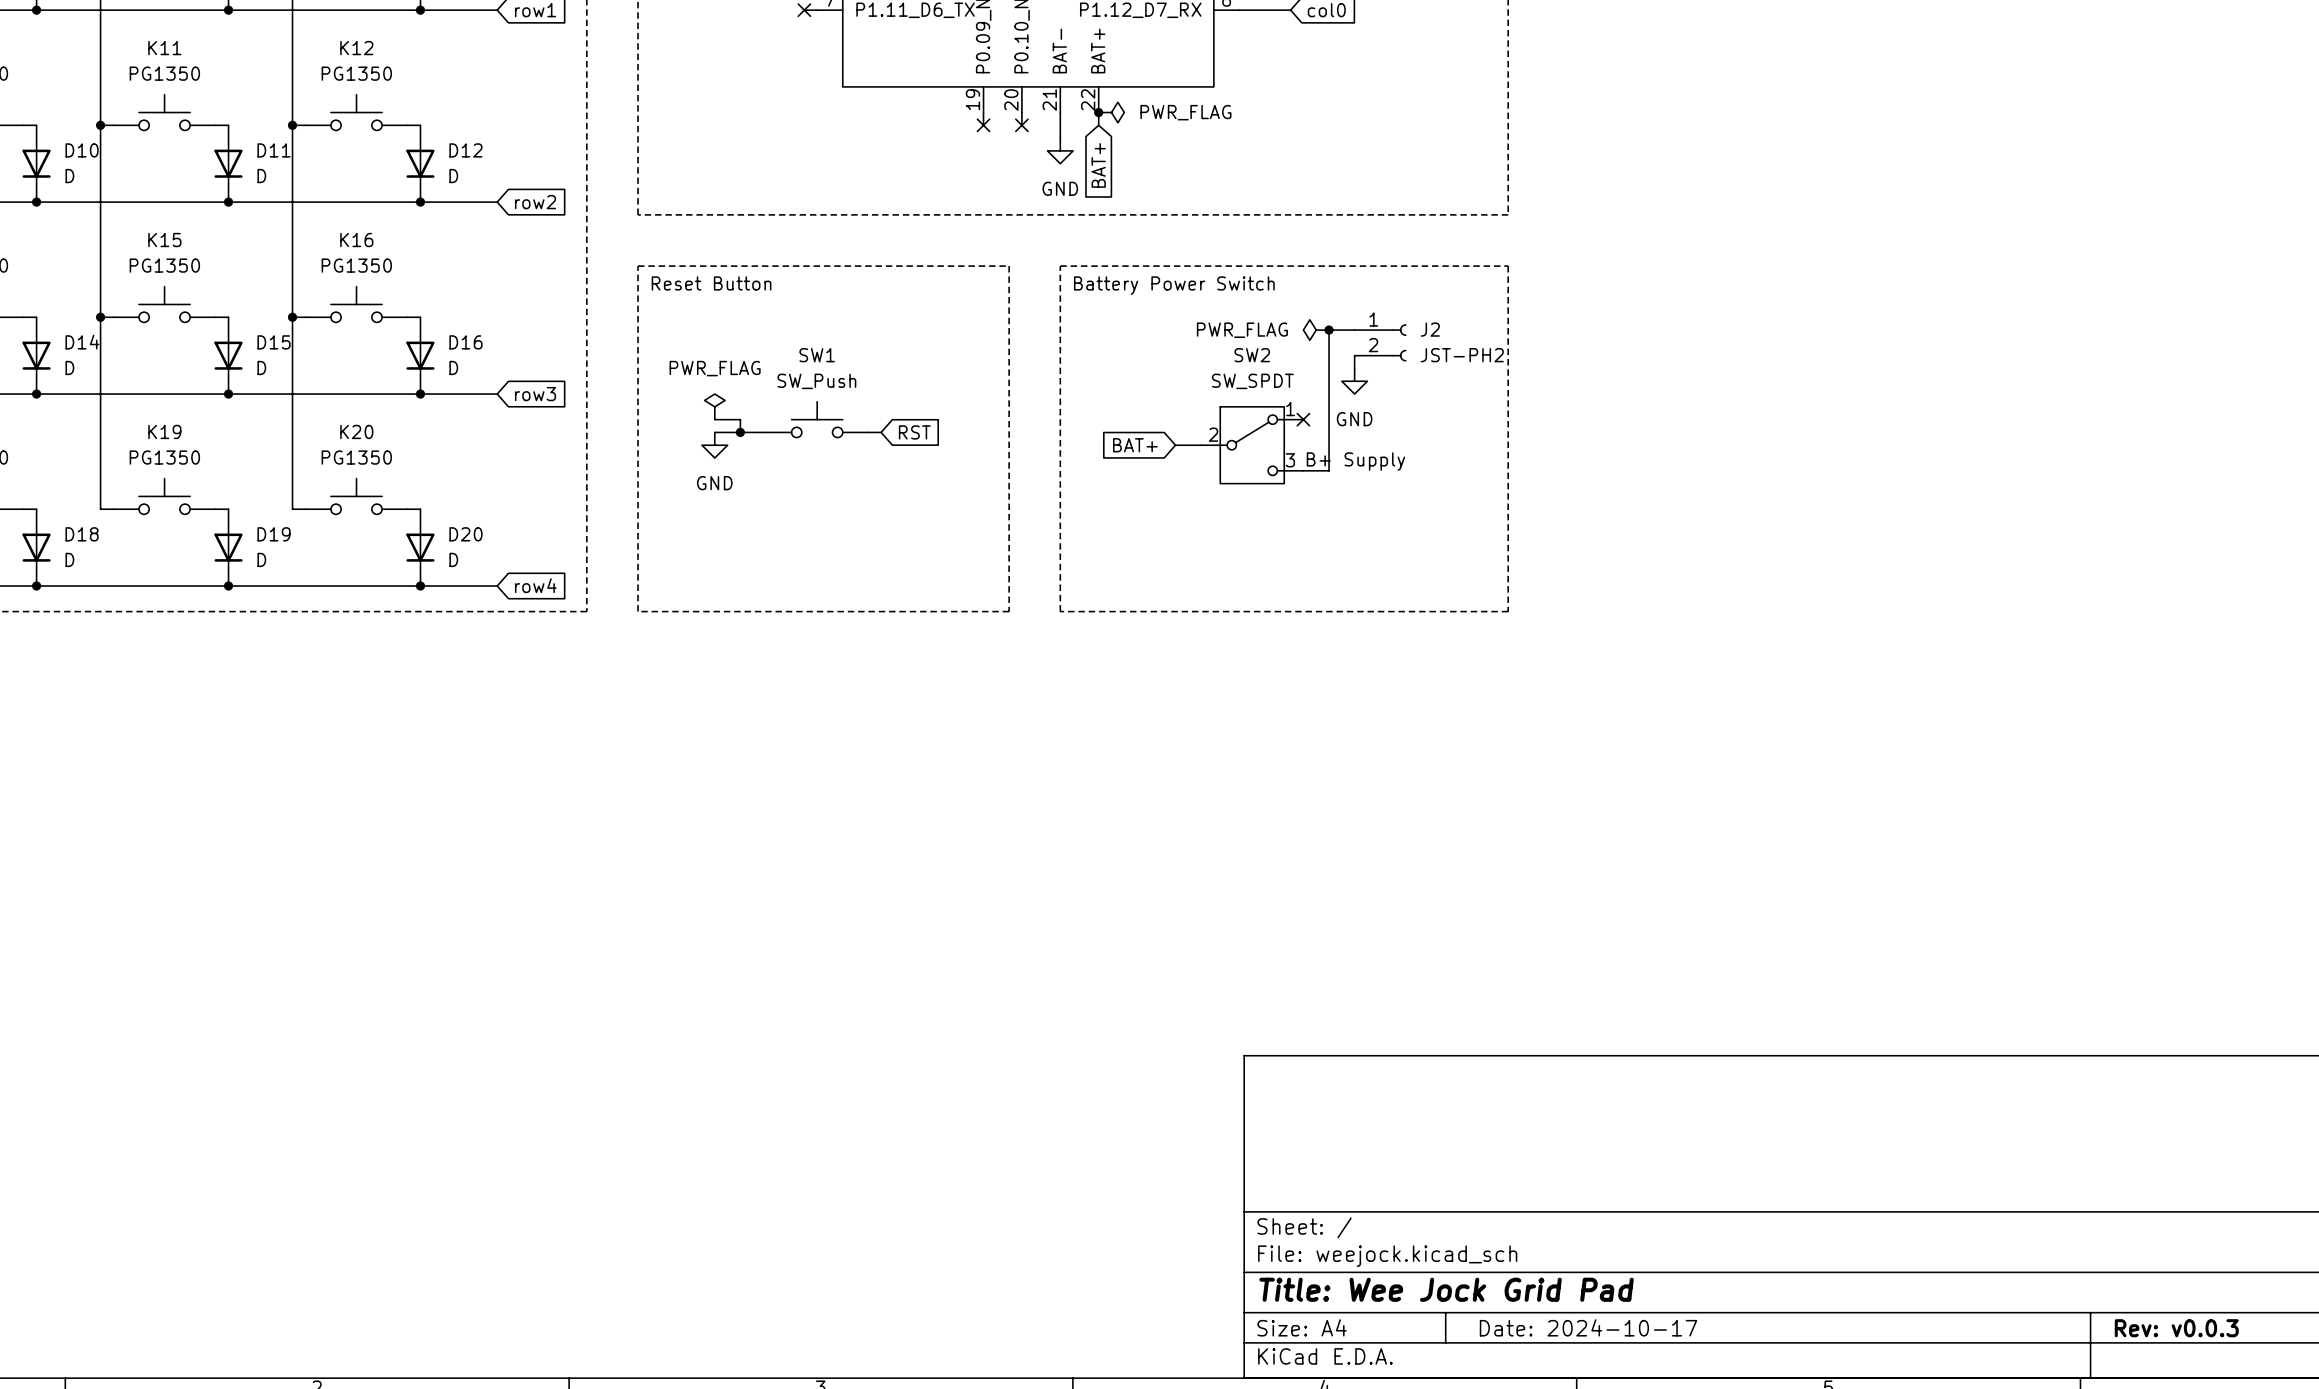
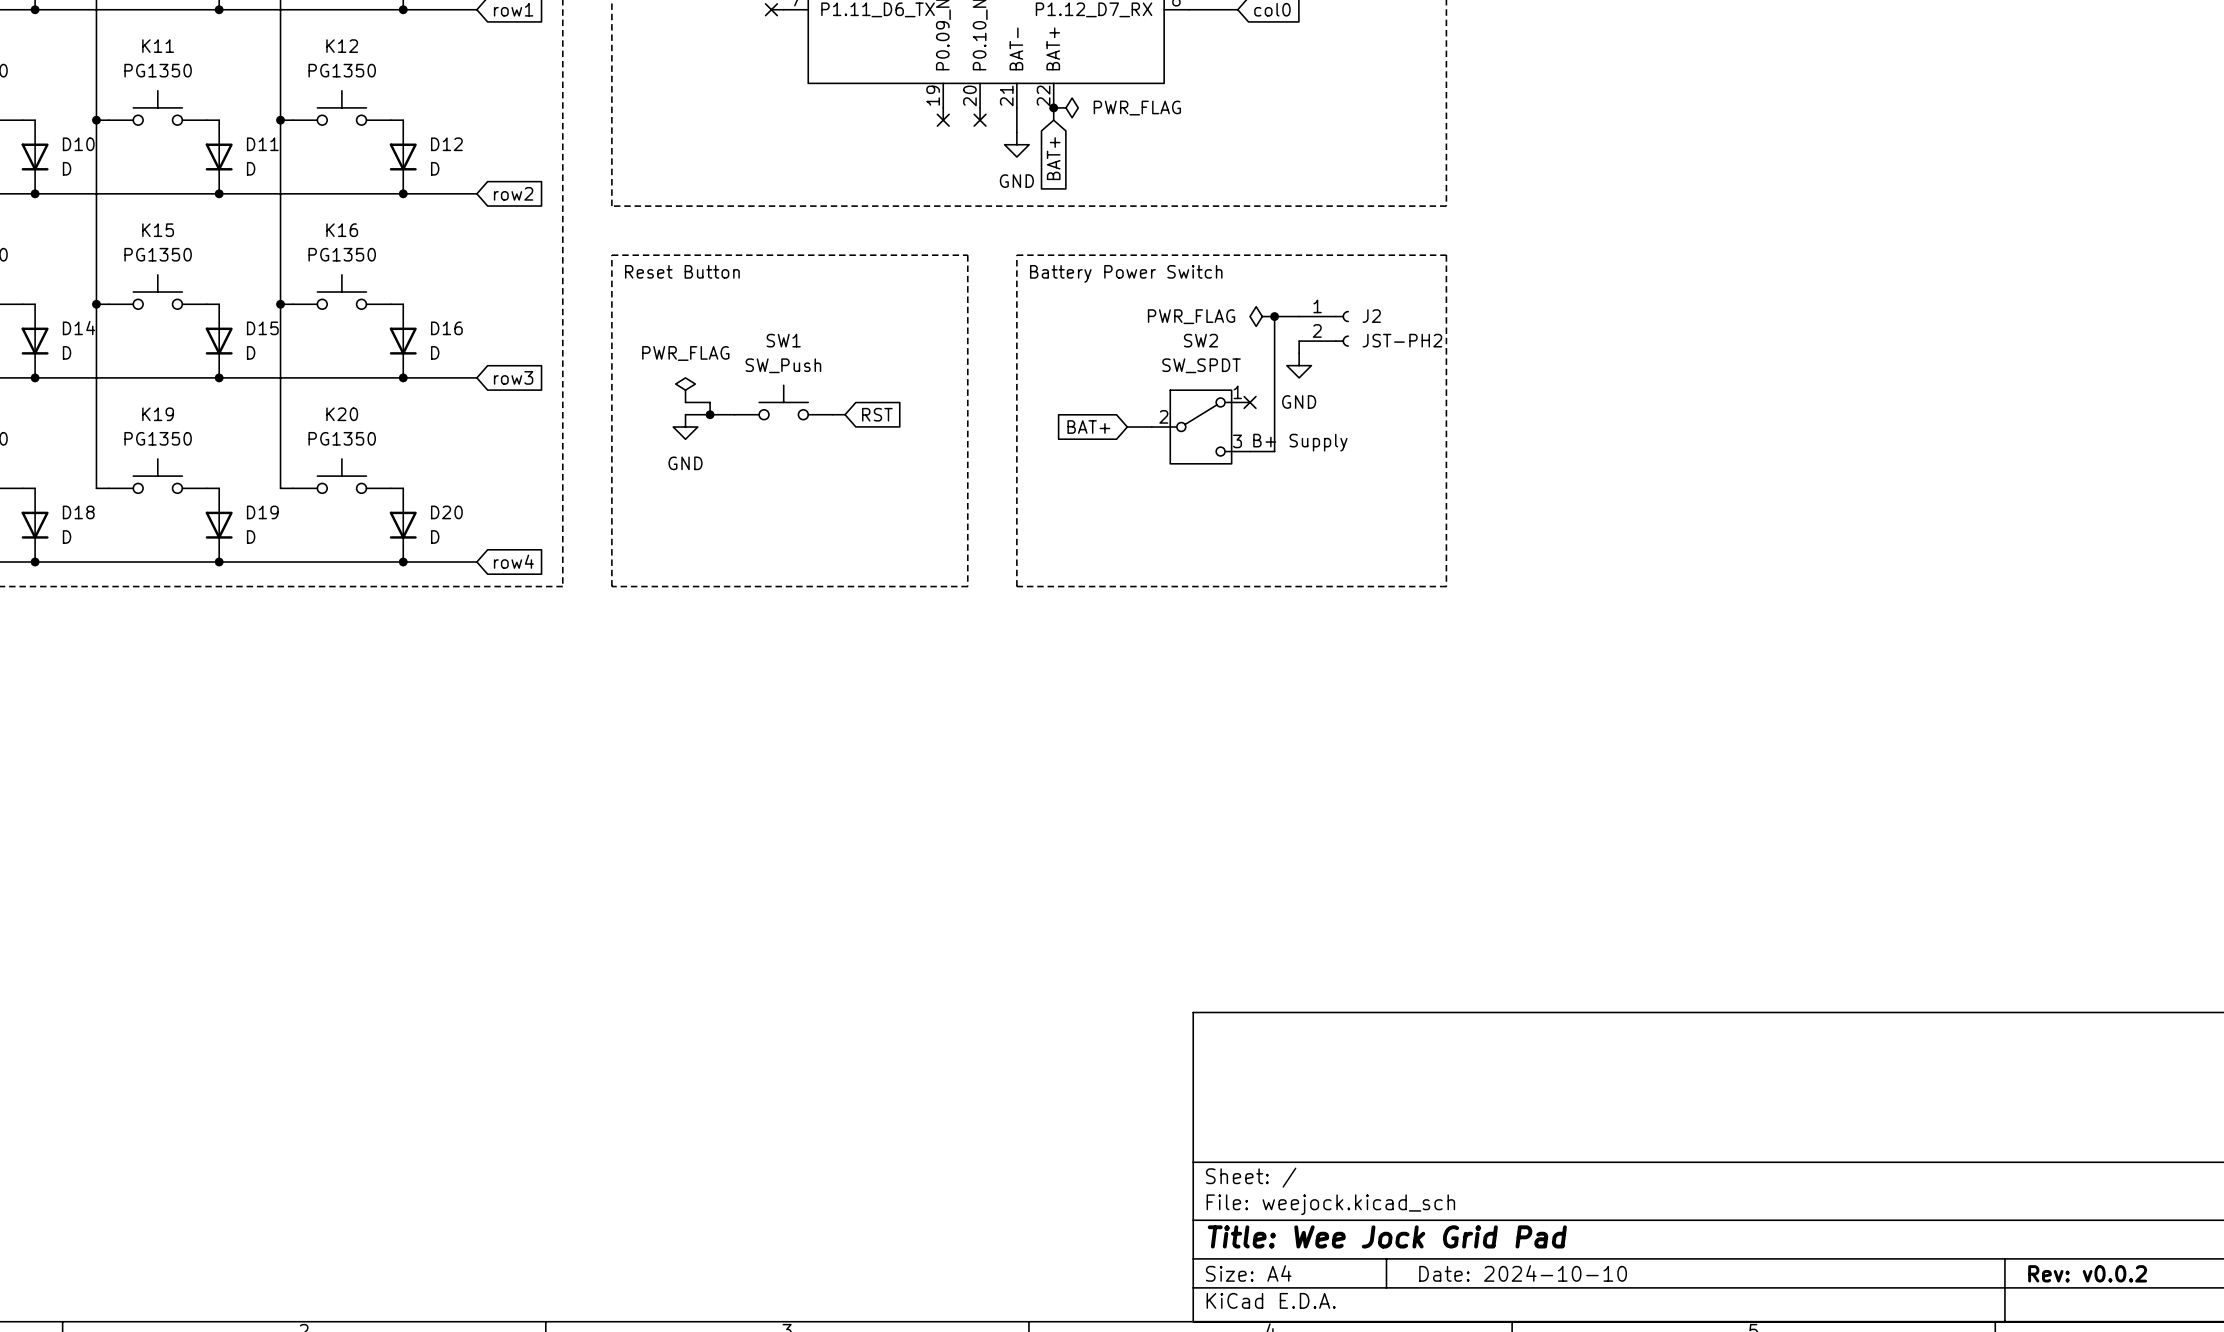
title block: Date: 2024-10-17 (1588, 1327) -> Date: 2024-10-10 (1523, 1273)
title block: Rev: v0.0.3 (2176, 1328) -> Rev: v0.0.2 (2087, 1273)

